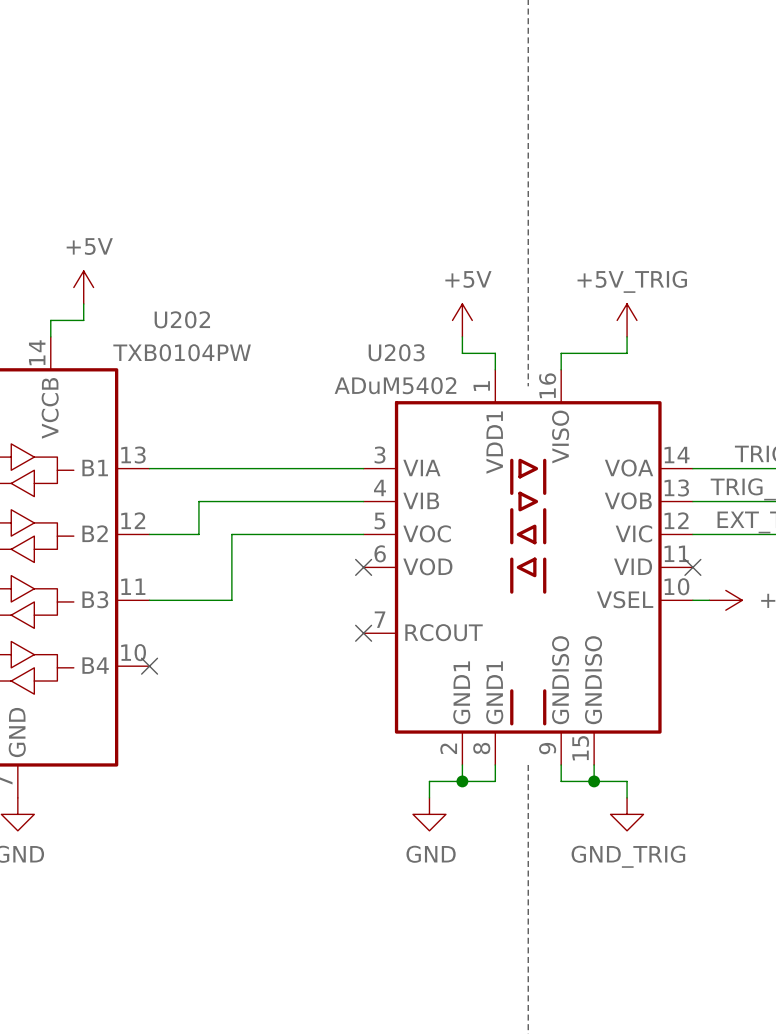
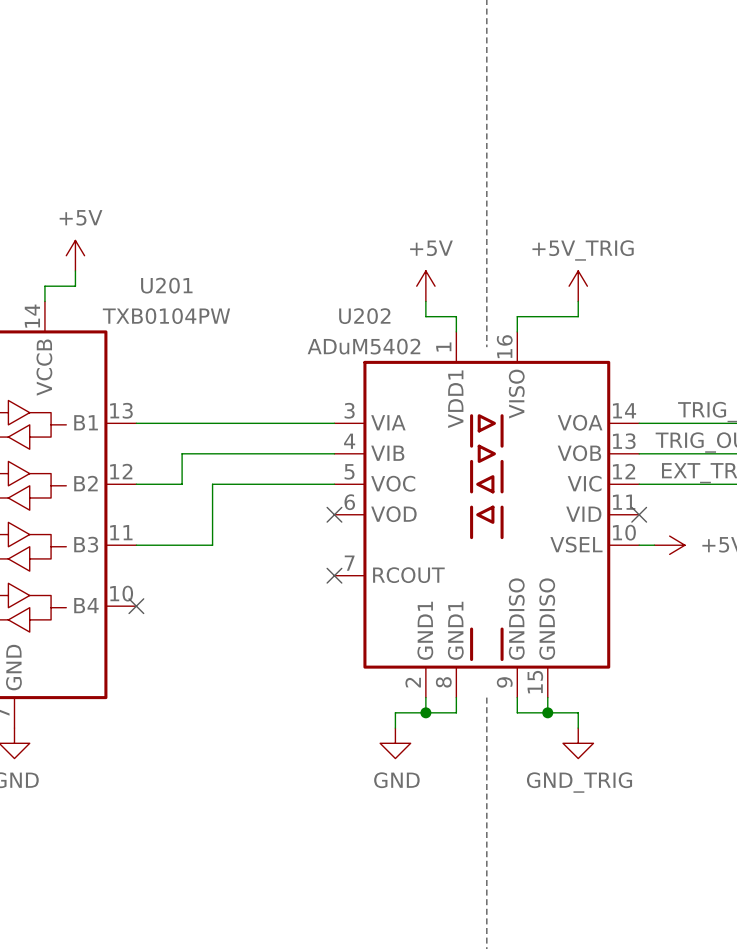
U202 name: U202 (182, 319) -> U201 (166, 285)
U203 name: U203 (396, 352) -> U202 (364, 316)

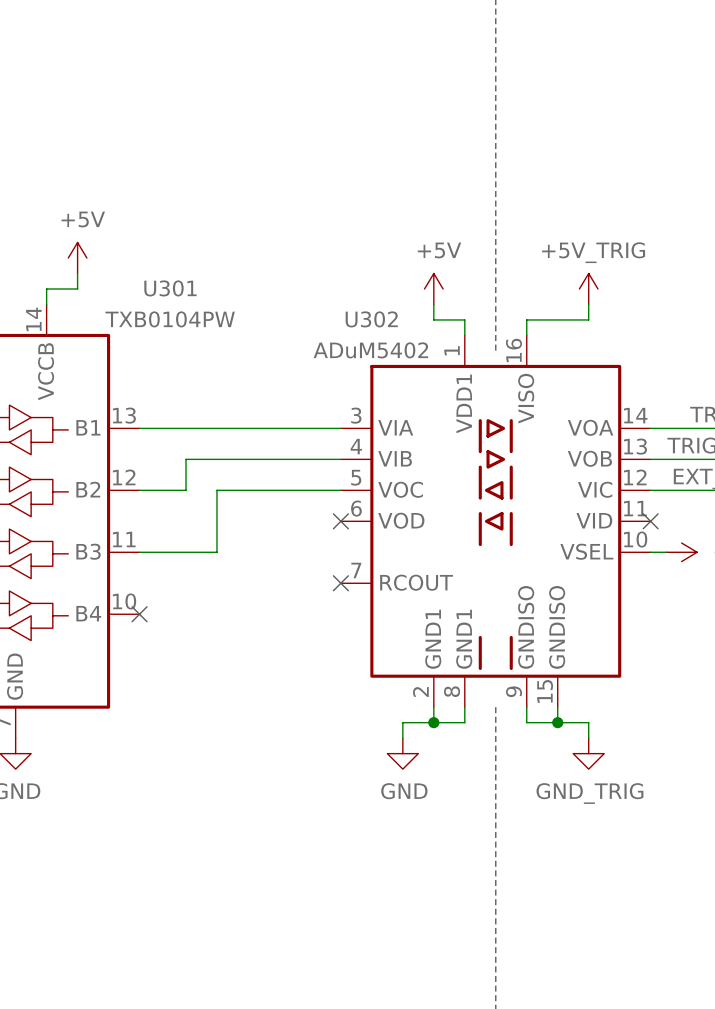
U201 name: U201 (166, 285) -> U301 (170, 288)
U202 name: U202 (364, 316) -> U302 (371, 319)

